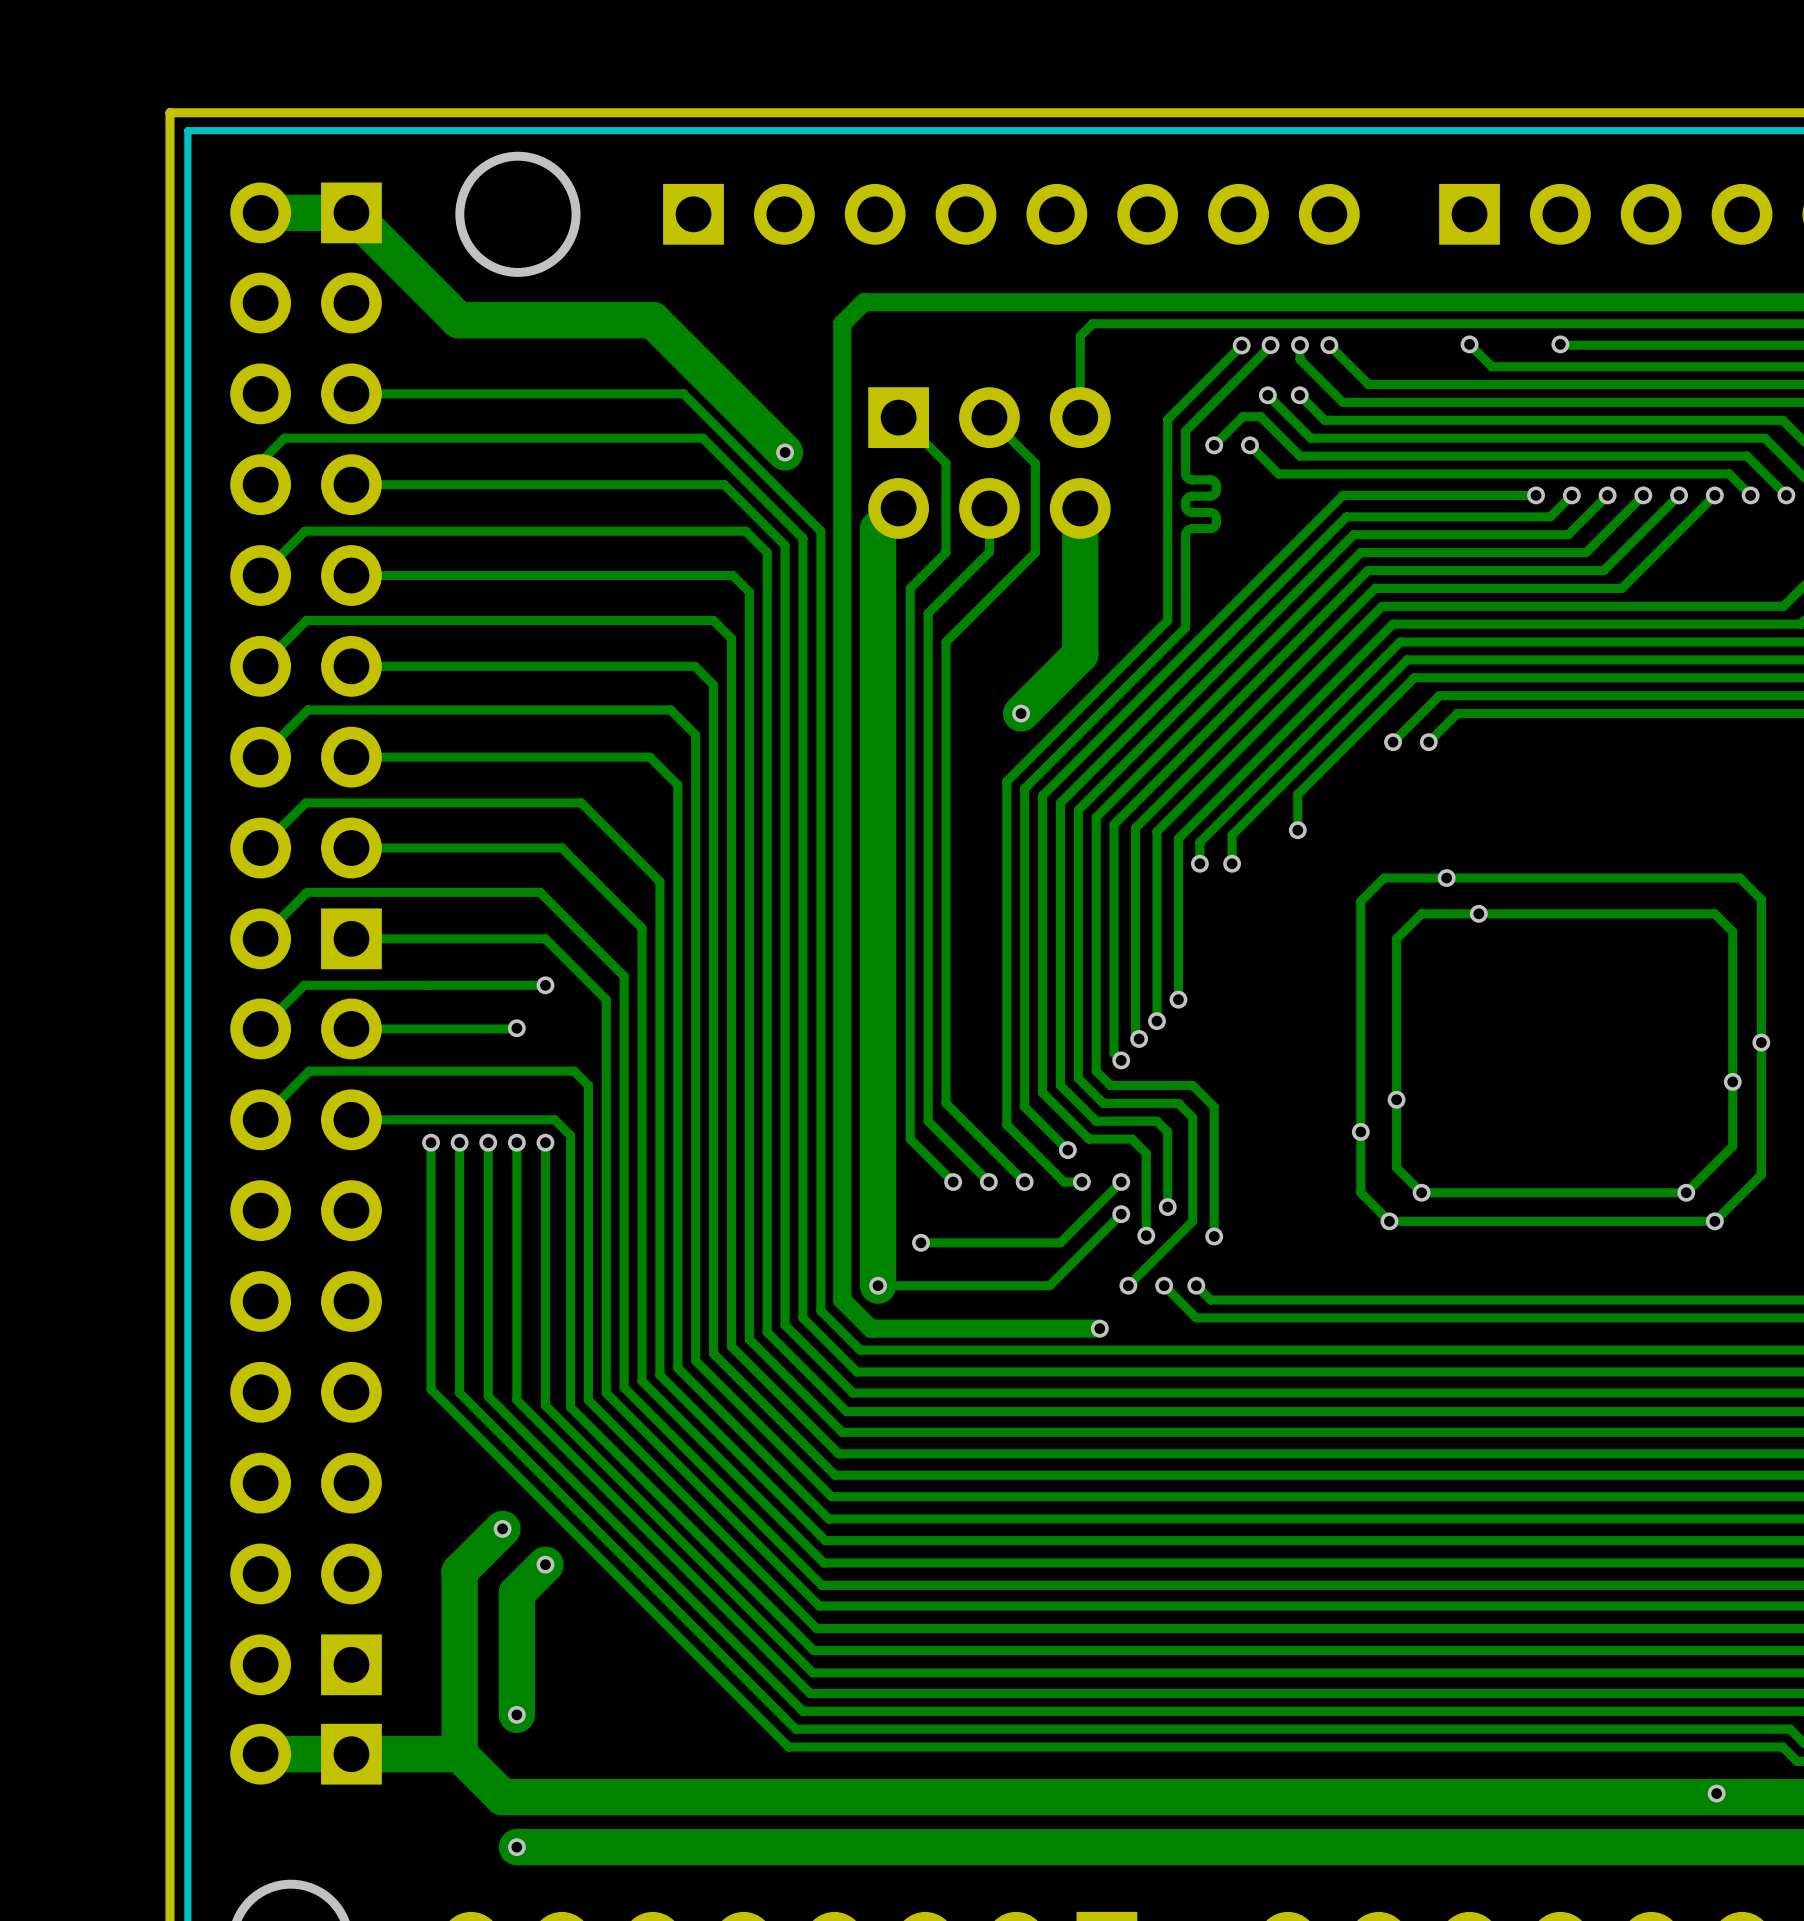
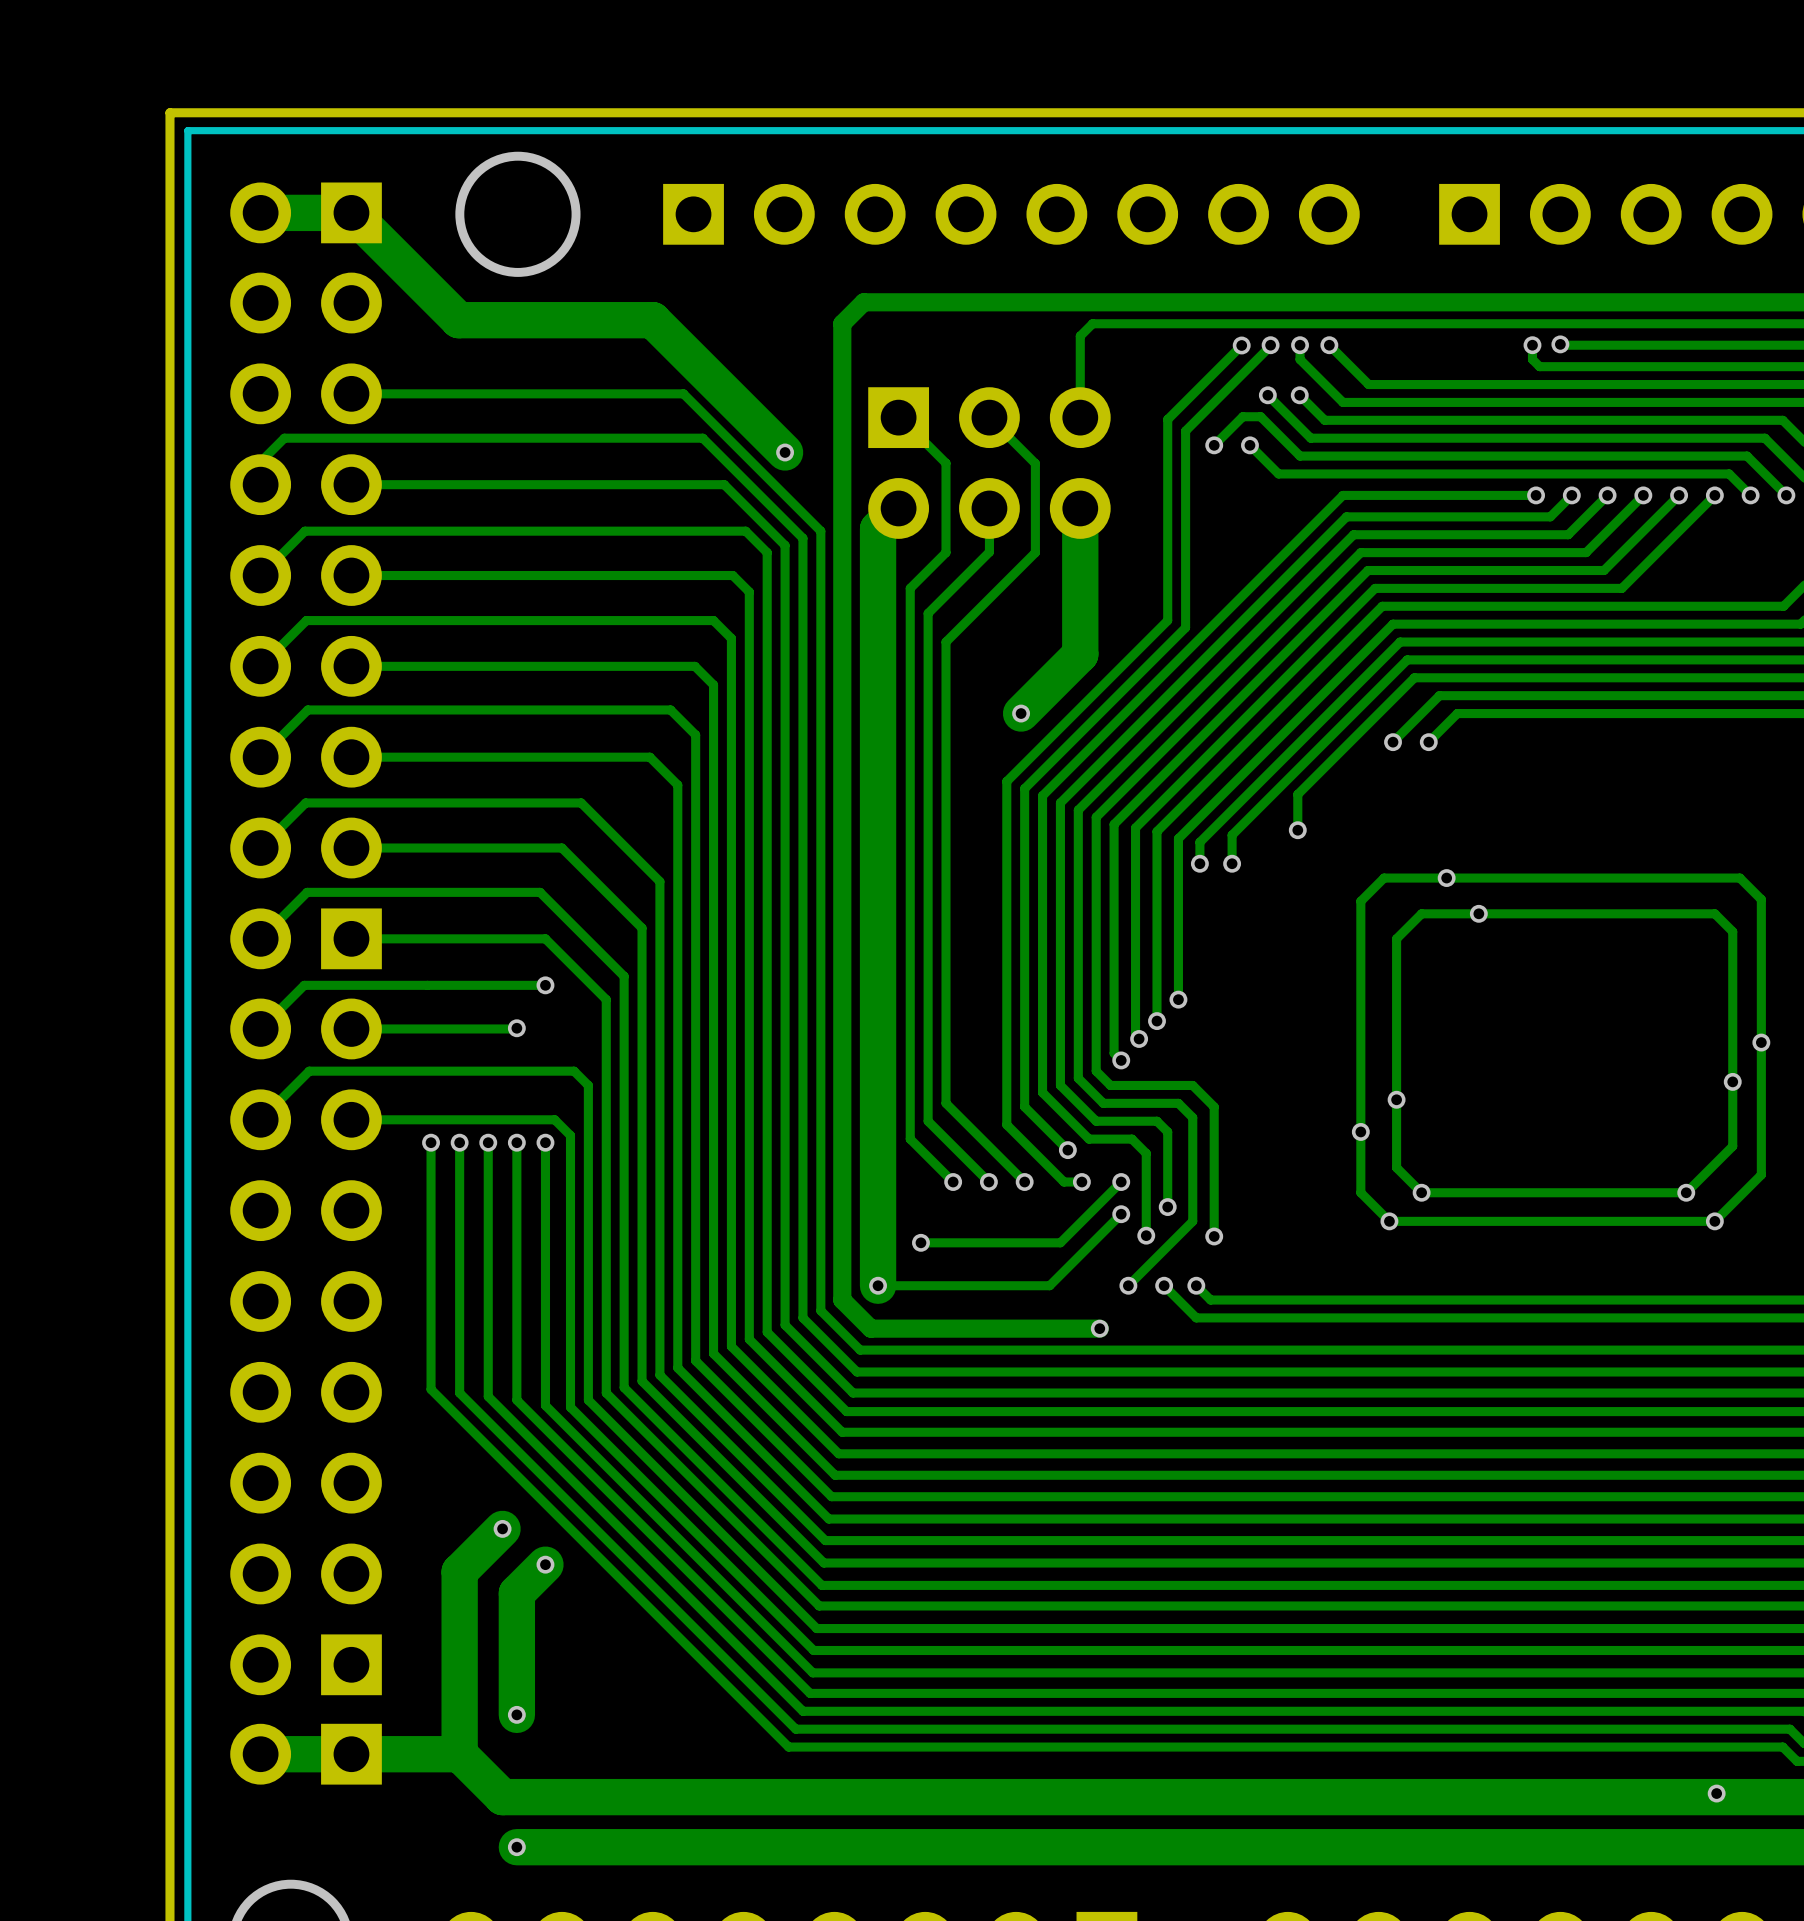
track: (1469, 344) (1491, 366) (1539, 366) -> (1532, 345) (1532, 359) (1539, 366)
via position: (1469, 344) -> (1532, 345)
track: (1185, 473) (1190, 479) (1212, 480) (1216, 486) (1216, 491) (1212, 495) (1190, 496) (1185, 502) -> (1185, 473) (1185, 502)
track: (1185, 505) (1190, 512) (1212, 513) (1216, 518) (1216, 524) (1212, 527) (1190, 528) (1185, 535) -> (1185, 505) (1185, 535)

